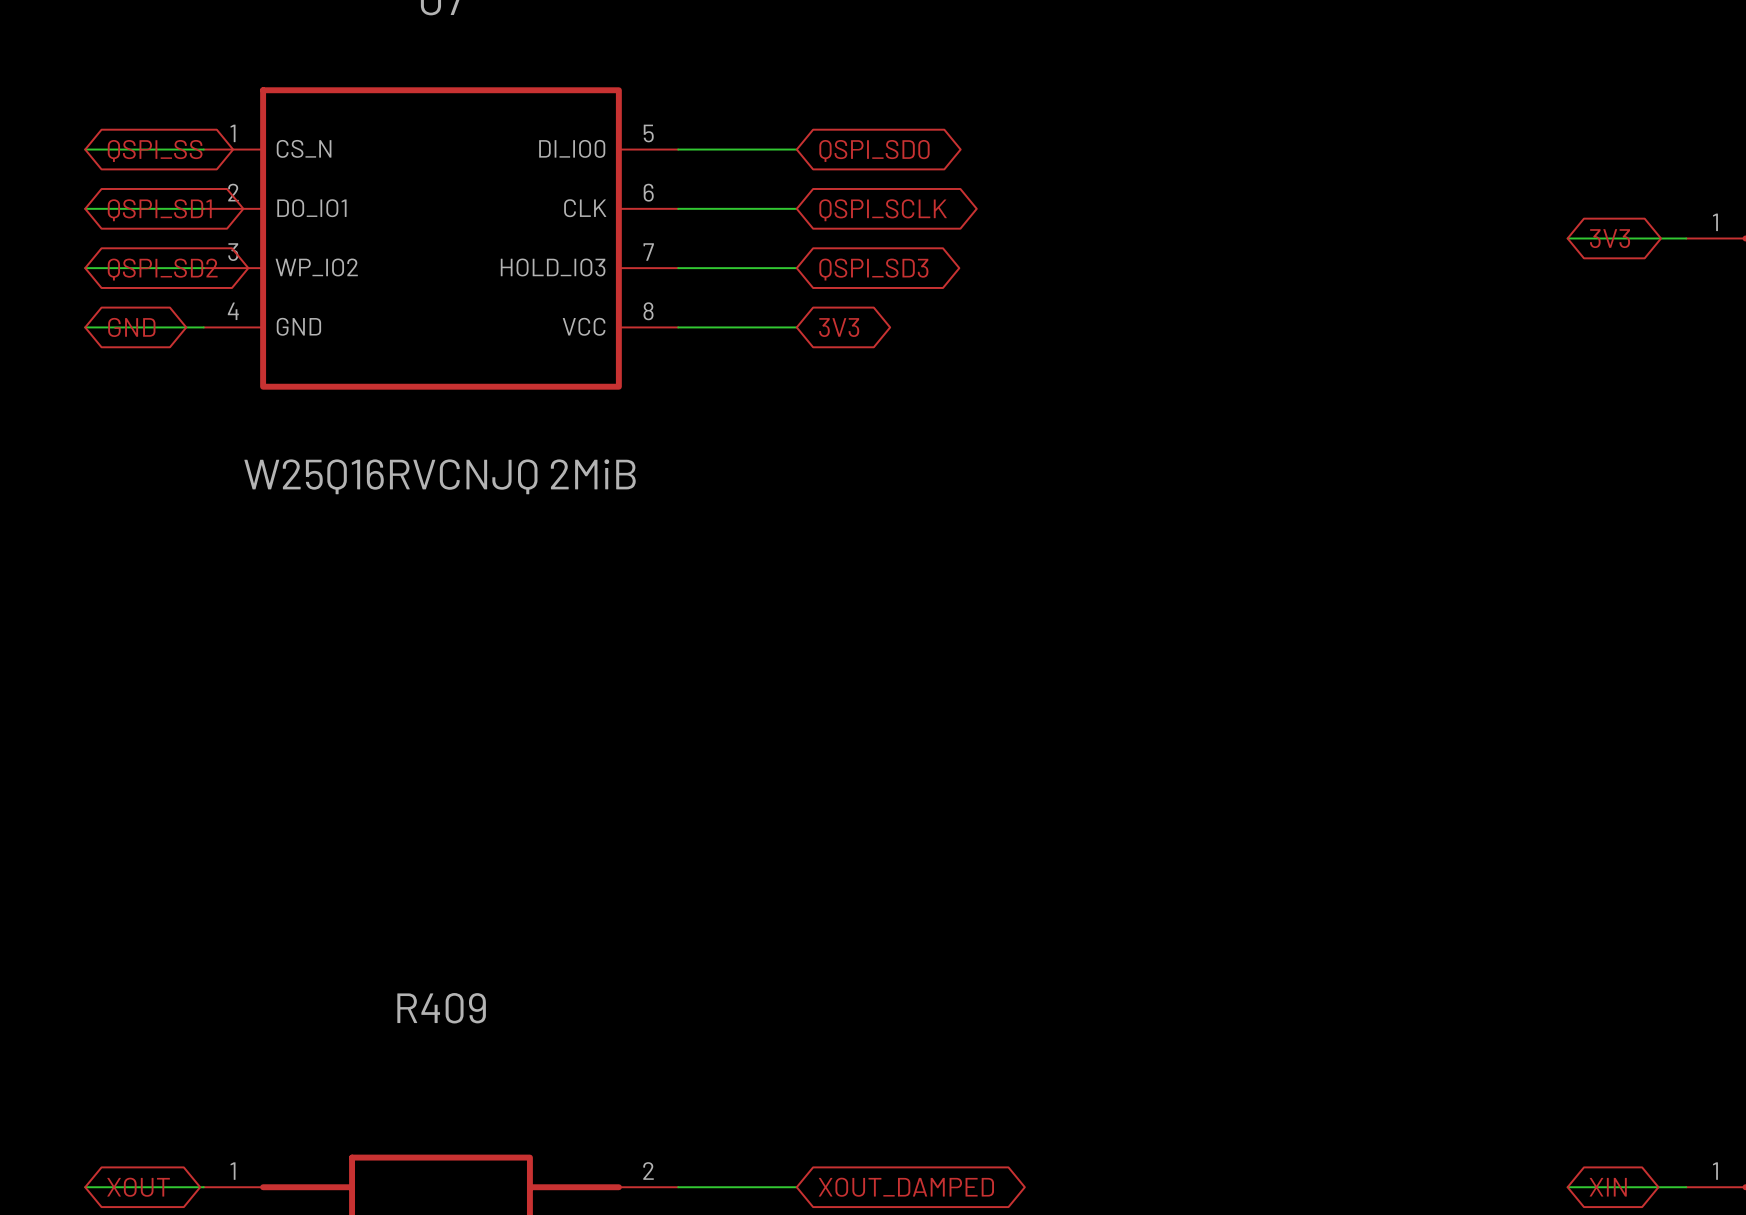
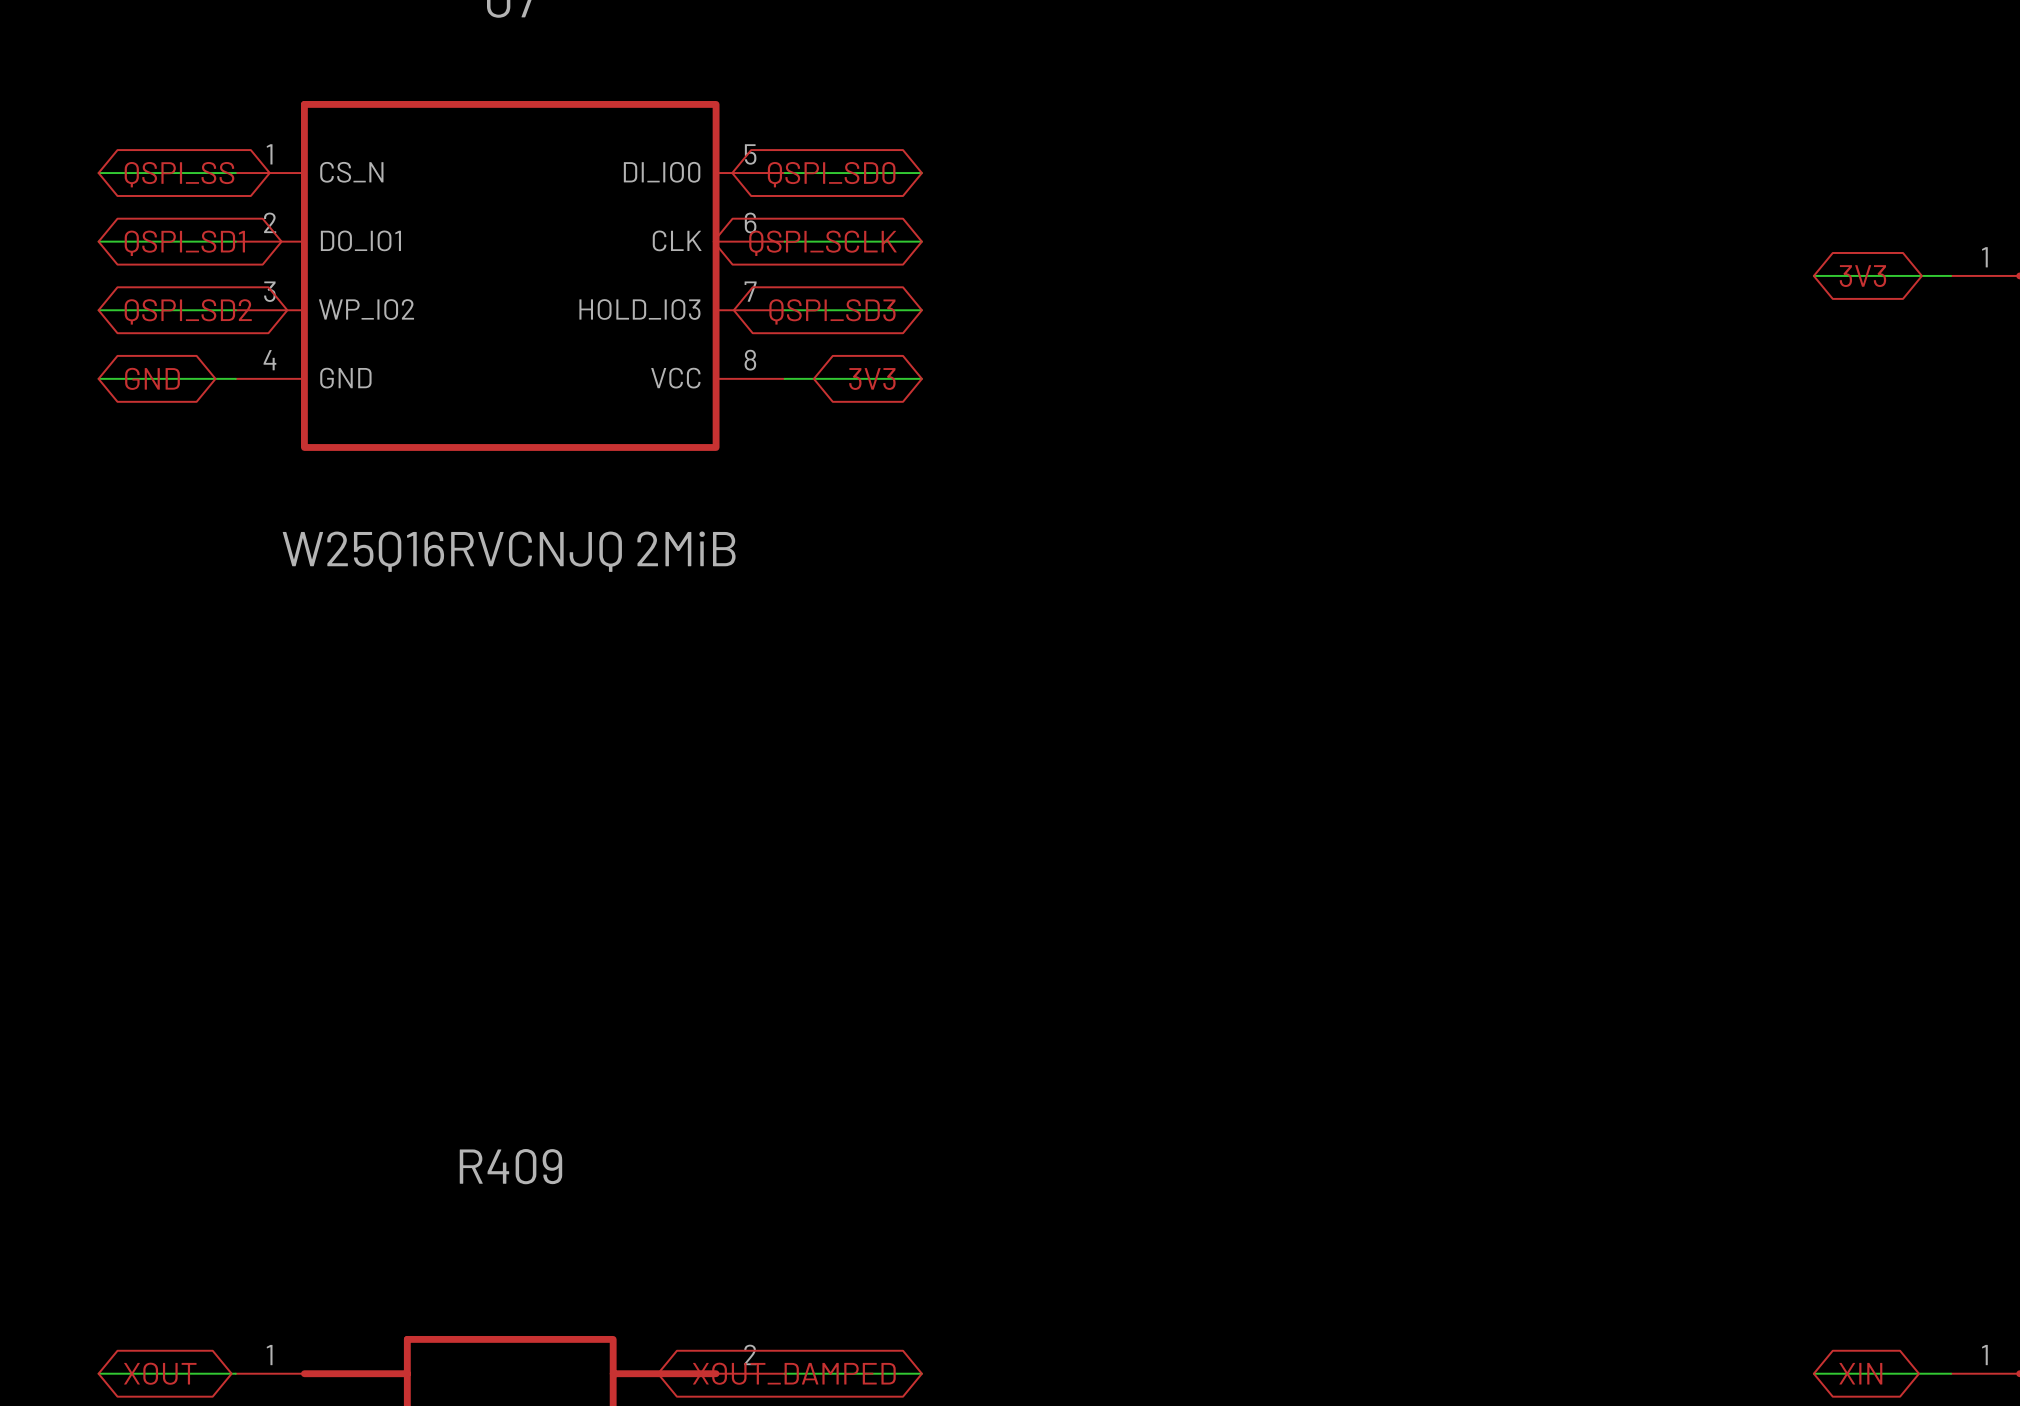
global label rotation: 0° (874, 150) -> 180° (831, 174)
global label rotation: 0° (883, 210) -> 180° (823, 243)
global label rotation: 0° (873, 269) -> 180° (832, 311)
global label rotation: 0° (839, 327) -> 180° (872, 378)
global label rotation: 0° (906, 1187) -> 180° (794, 1373)

